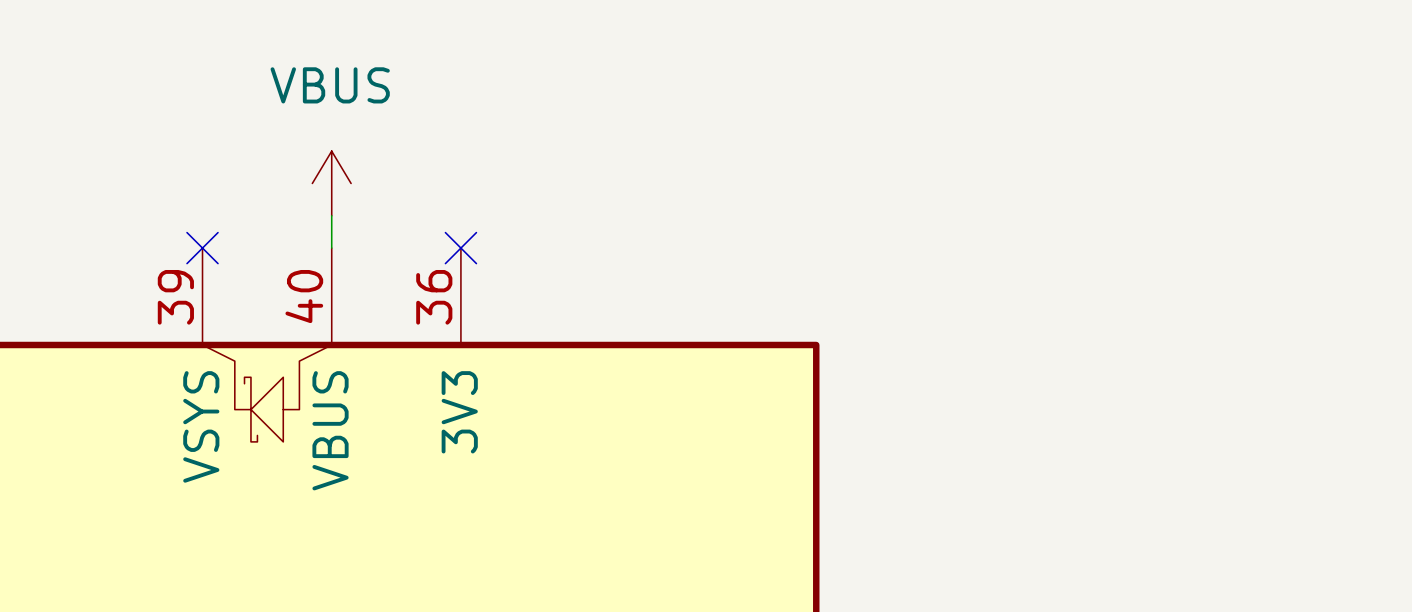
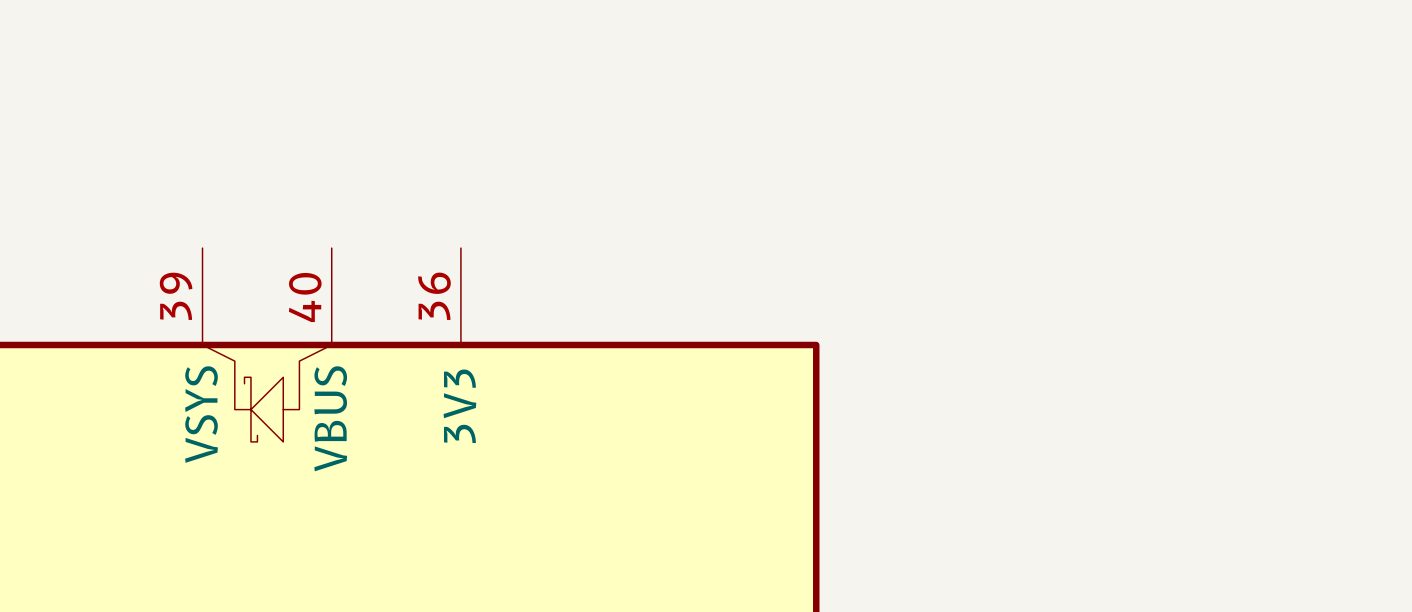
power symbol: VBUS (331, 183) -> none
wire: (331, 215) (331, 248) -> none
no-connect mark: (202, 248) -> none
no-connect mark: (460, 248) -> none

